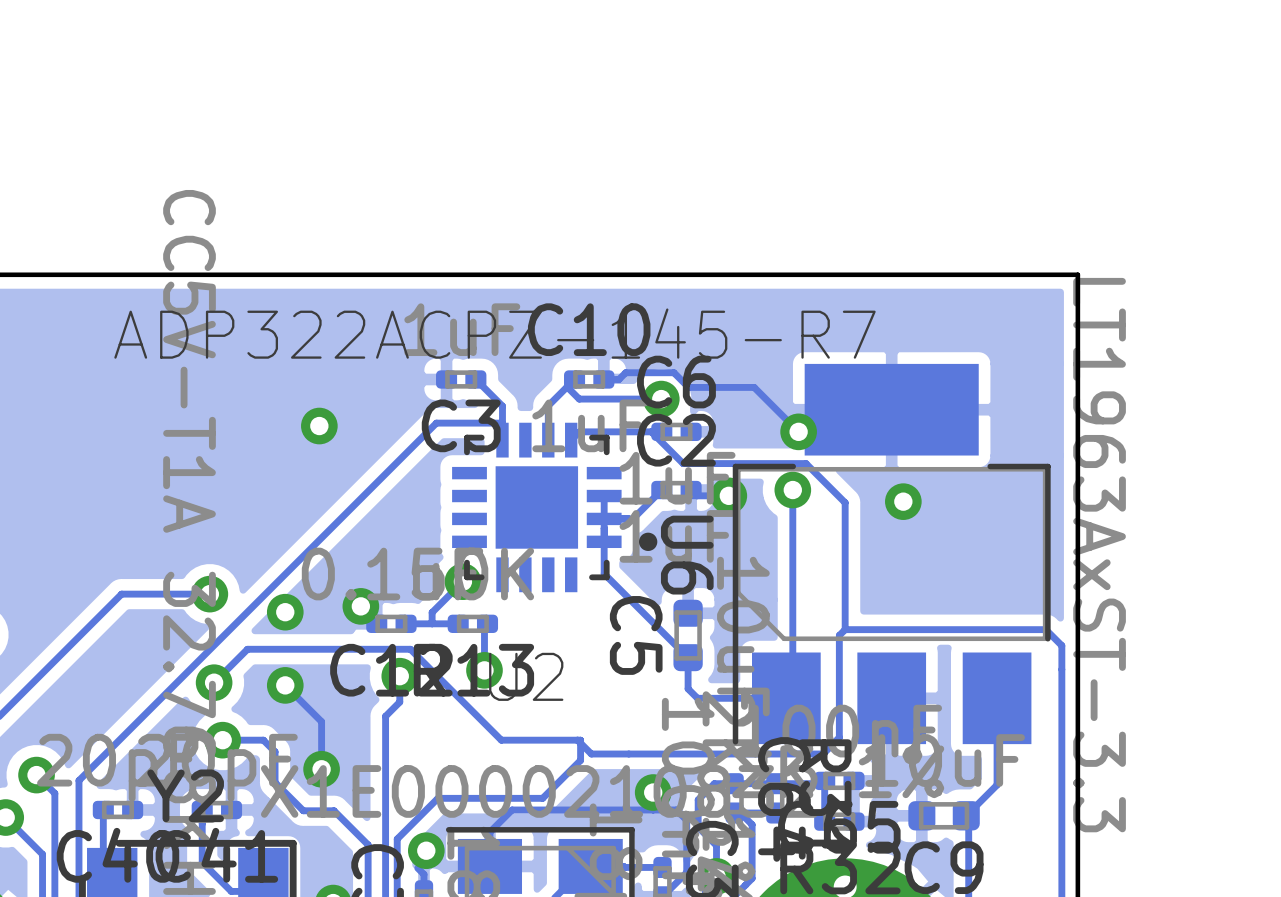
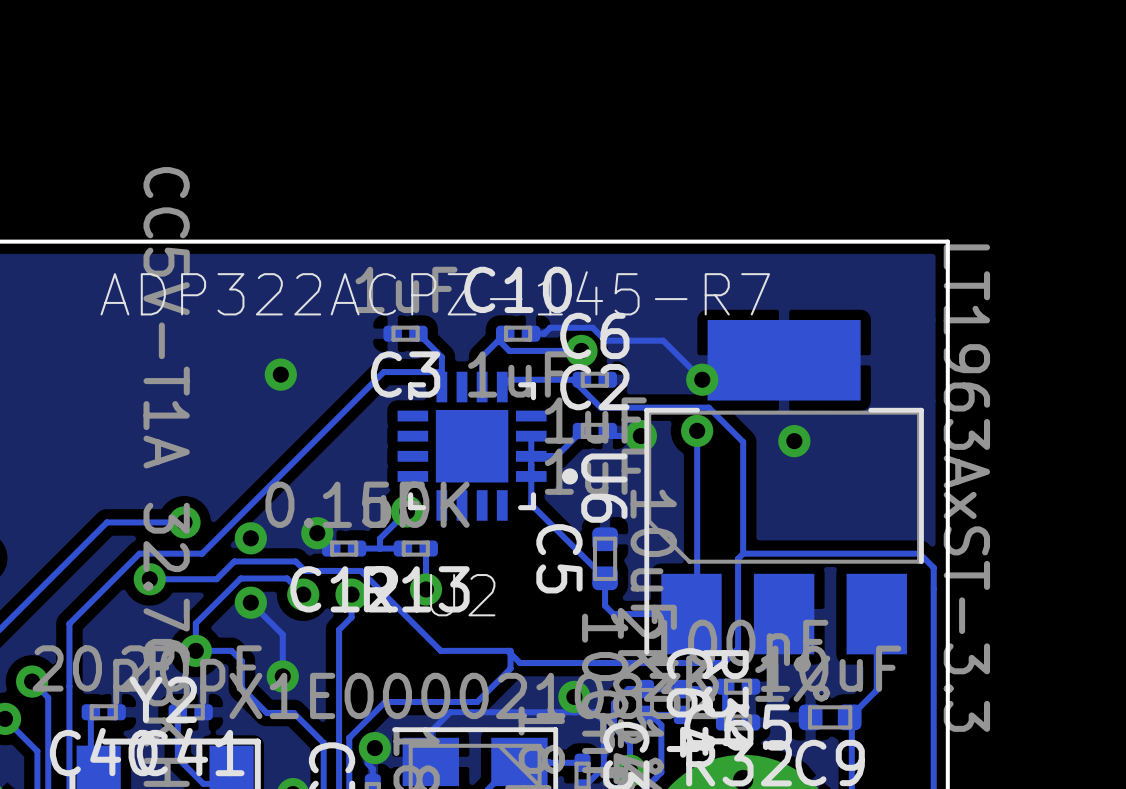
track: (229, 629) (78, 780) -> (202, 553) (139, 553) (69, 623) (69, 686)
track: (347, 649) (247, 649) (214, 682) -> (305, 570) (295, 561) (234, 561) (216, 579) (149, 579)
track: none -> (303, 594) (287, 578) (240, 578) (195, 623) (195, 650)
via: none -> (303, 594)
via position: (214, 682) -> (149, 579)

